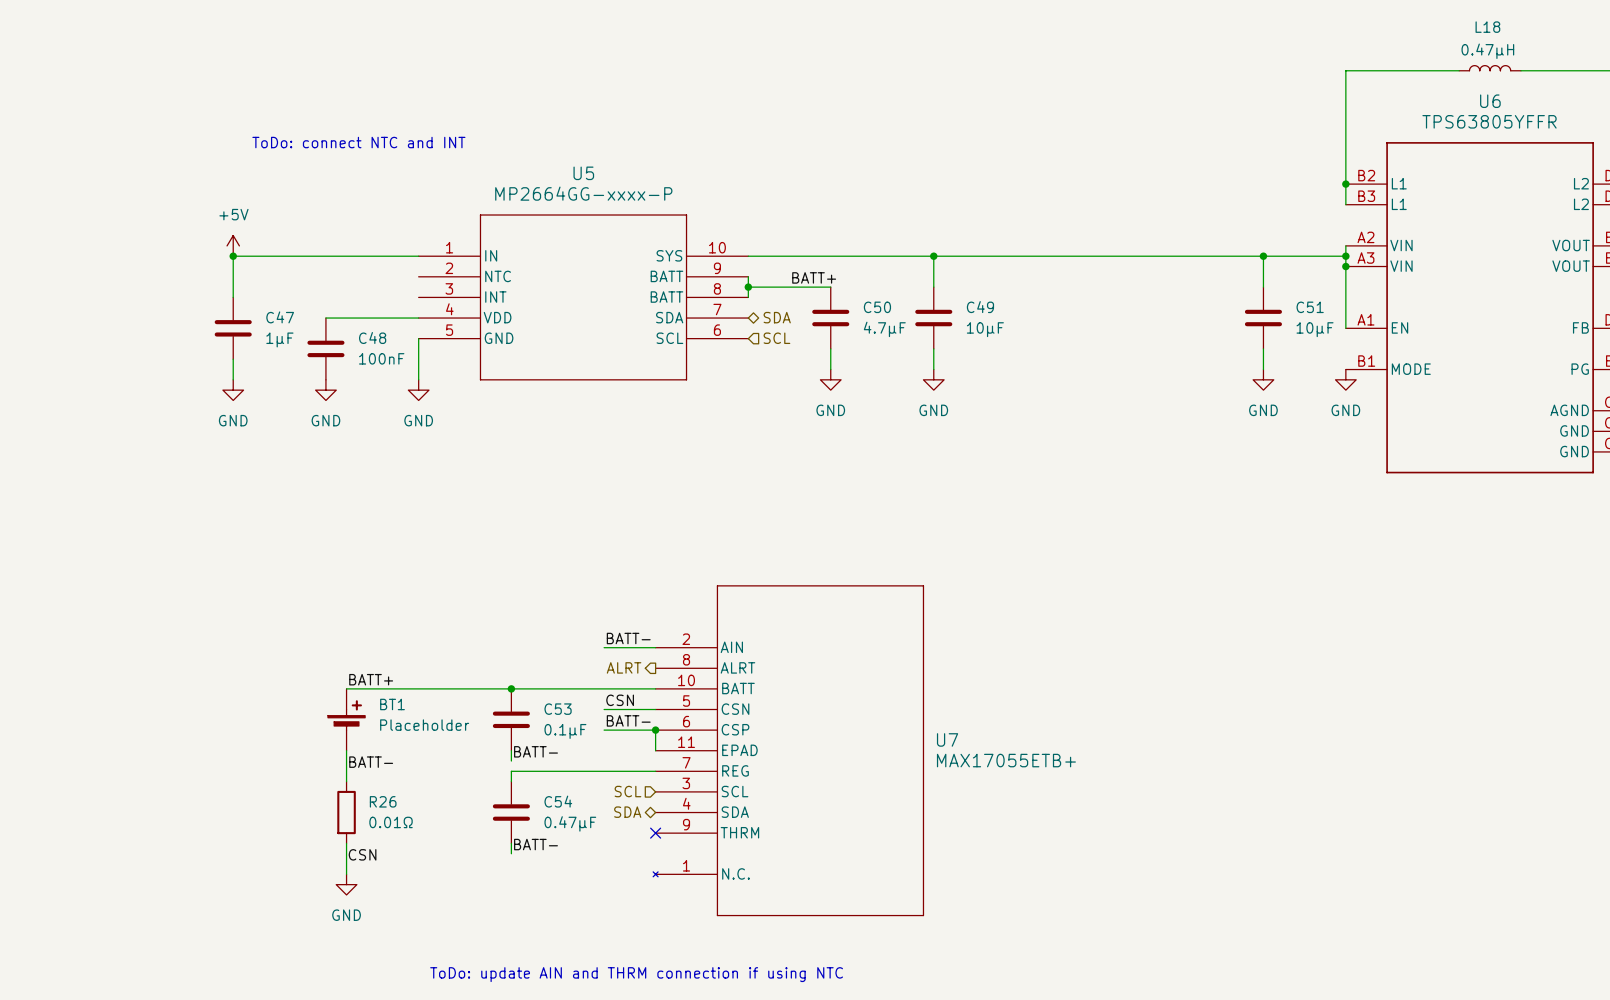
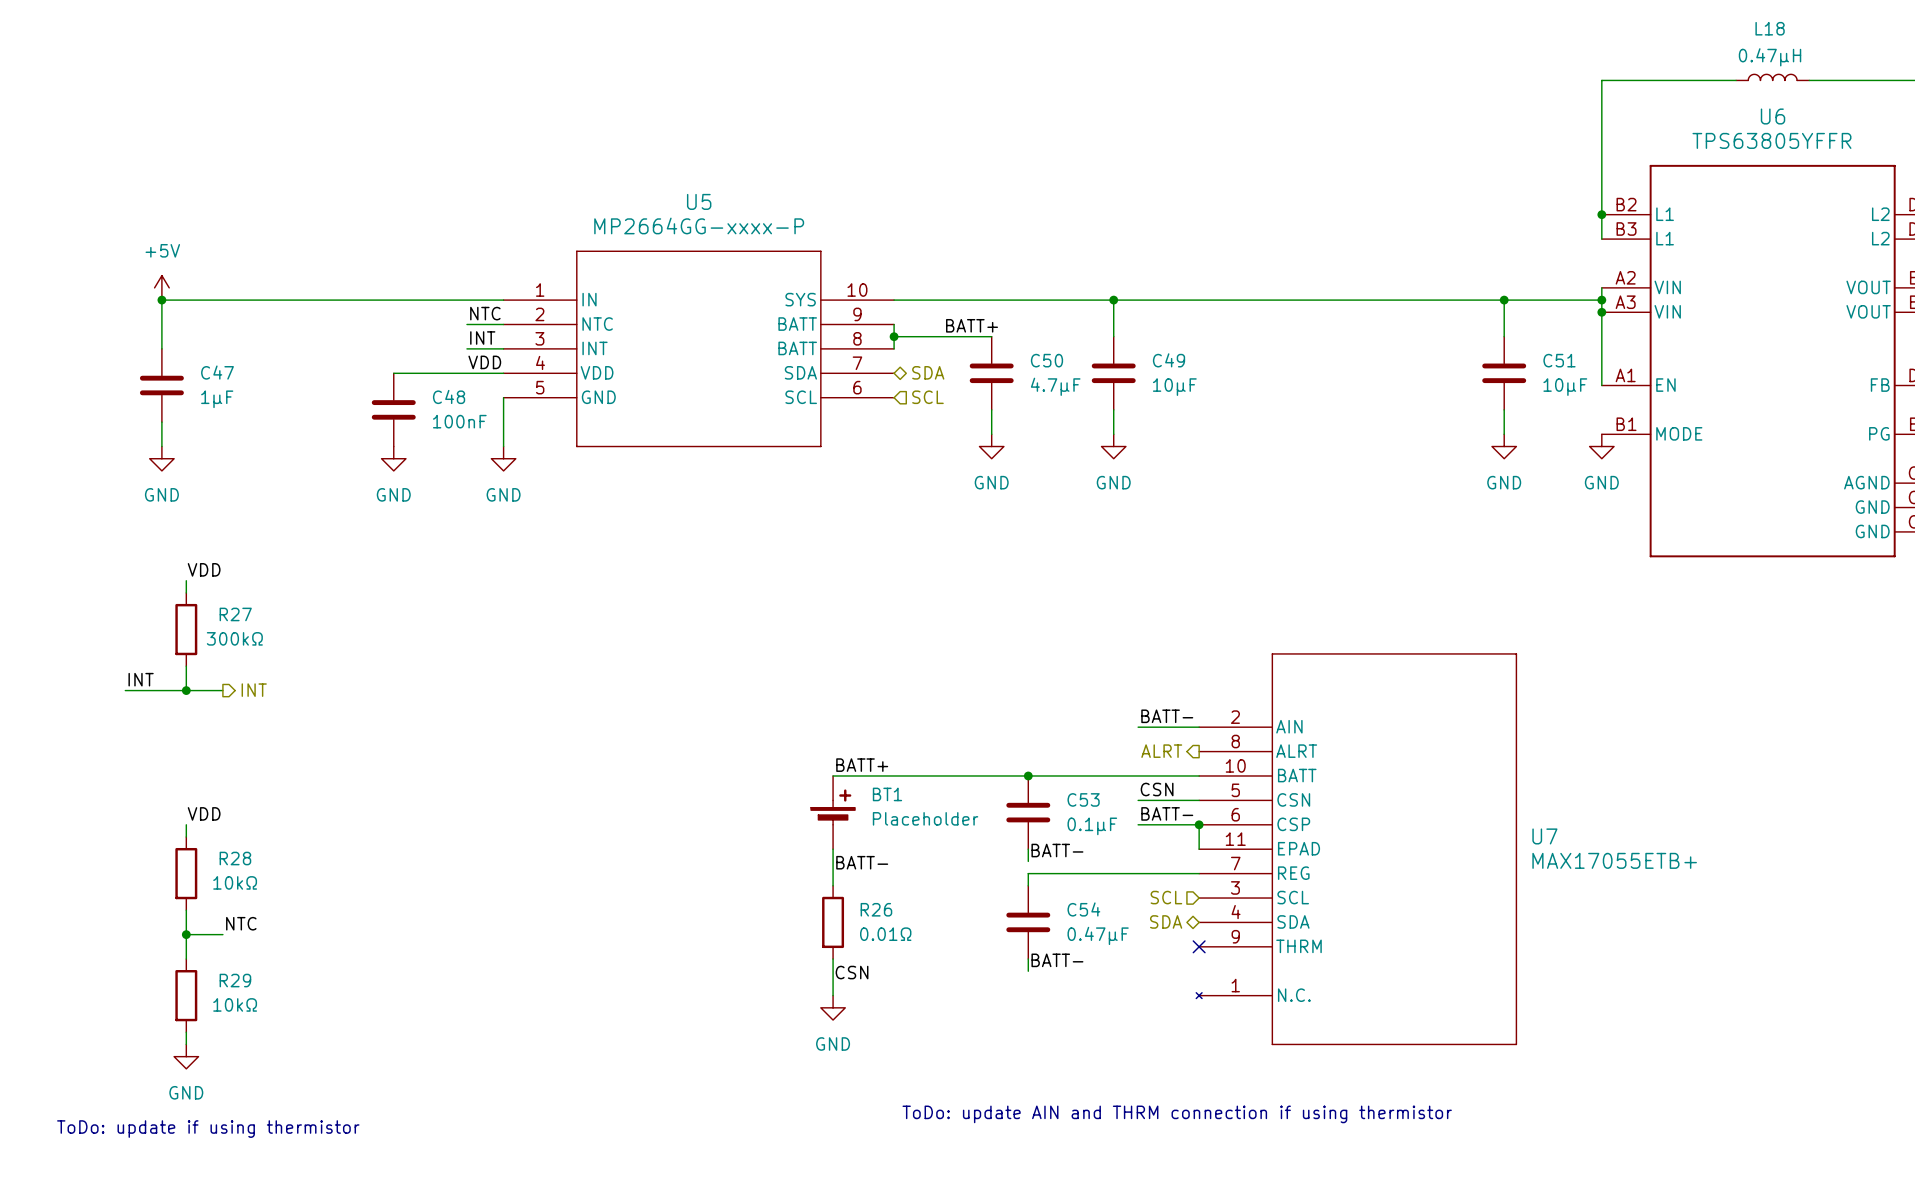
text: ToDo: connect NTC and INT (358, 142) -> none
power symbol position: +5V (233, 245) -> +5V (161, 287)
junction: none -> (161, 300)
wire: (233, 256) (233, 297) -> (283, 300) (161, 300) (161, 348)
junction: (233, 256) -> none
label: none -> NTC (485, 313)
wire: none -> (466, 324) (503, 324)
label: none -> INT (482, 338)
wire: none -> (466, 348) (503, 348)
label: none -> VDD (484, 362)
C47 position: (233, 328) -> (161, 385)
wire: (233, 359) (233, 379) -> (161, 422) (161, 446)
power symbol position: GND (233, 390) -> GND (161, 458)
label: none -> VDD (204, 569)
wire: none -> (186, 580) (186, 592)
R27: none -> 300kΩ (186, 629)
wire: none -> (186, 666) (186, 690)
label: none -> INT (141, 679)
wire: none -> (125, 690) (222, 690)
junction: none -> (186, 690)
hierarchical label: none -> INT (254, 690)
label: none -> BATT- (1167, 716)
wire: none -> (1138, 727) (1199, 727)
hierarchical label: none -> ALRT (1161, 751)
label: BATT- (628, 638) -> none
wire: (604, 647) (655, 647) -> none
label: none -> BATT+ (862, 765)
wire: none -> (833, 775) (1199, 775)
junction: none -> (1028, 775)
hierarchical label: ALRT (624, 667) -> none
label: none -> CSN (1157, 789)
wire: none -> (1138, 800) (1199, 800)
label: BATT+ (371, 679) -> none
wire: (346, 688) (655, 688) -> none
junction: (511, 688) -> none
label: none -> VDD (204, 813)
label: none -> BATT- (1167, 813)
wire: none -> (186, 824) (186, 837)
wire: none -> (1138, 824) (1199, 824) (1199, 849)
junction: none -> (1199, 824)
label position: CSN (620, 700) -> CSN (852, 972)
wire: (604, 709) (655, 709) -> none
BT1 position: (346, 719) -> (833, 812)
C53 position: (511, 719) -> (1028, 812)
wire: none -> (833, 849) (833, 885)
wire: none -> (1028, 849) (1028, 861)
label: BATT- (628, 720) -> none
label: none -> BATT- (1057, 850)
wire: (604, 730) (655, 730) (655, 750) -> none
junction: (655, 730) -> none
label: none -> BATT- (862, 862)
R28: none -> 10kΩ (186, 873)
wire: none -> (1199, 873) (1028, 873) (1028, 885)
wire: (346, 750) (346, 781) -> none
wire: (511, 750) (511, 761) -> none
U7 position: (788, 750) -> (1356, 849)
label: BATT- (535, 751) -> none
hierarchical label: none -> SCL (1166, 897)
label: BATT- (371, 762) -> none
wire: none -> (186, 910) (186, 959)
wire: (655, 771) (511, 771) (511, 781) -> none
hierarchical label: none -> SDA (1166, 921)
label: none -> NTC (241, 923)
wire: none -> (186, 934) (222, 934)
junction: none -> (186, 934)
hierarchical label: SCL (627, 791) -> none
no-connect mark: none -> (1199, 946)
R26 position: (346, 812) -> (833, 922)
C54 position: (511, 812) -> (1028, 922)
hierarchical label: SDA (627, 812) -> none
wire: none -> (833, 959) (833, 995)
wire: none -> (1028, 959) (1028, 971)
label: none -> BATT- (1057, 960)
no-connect mark: (655, 833) -> none
R29: none -> 10kΩ (186, 995)
wire: (346, 843) (346, 874) -> none
wire: (511, 843) (511, 853) -> none
label: BATT- (535, 844) -> none
power symbol: none -> GND (833, 1007)
label: CSN (362, 854) -> none
wire: none -> (186, 1032) (186, 1044)
power symbol: GND (346, 884) -> none
power symbol: none -> GND (186, 1056)
text: none -> ToDo: update AIN and THRM connection if using thermistor (1177, 1114)
text: none -> ToDo: update if using thermistor (208, 1129)
text: ToDo: update AIN and THRM connection if using NTC (636, 974) -> none

